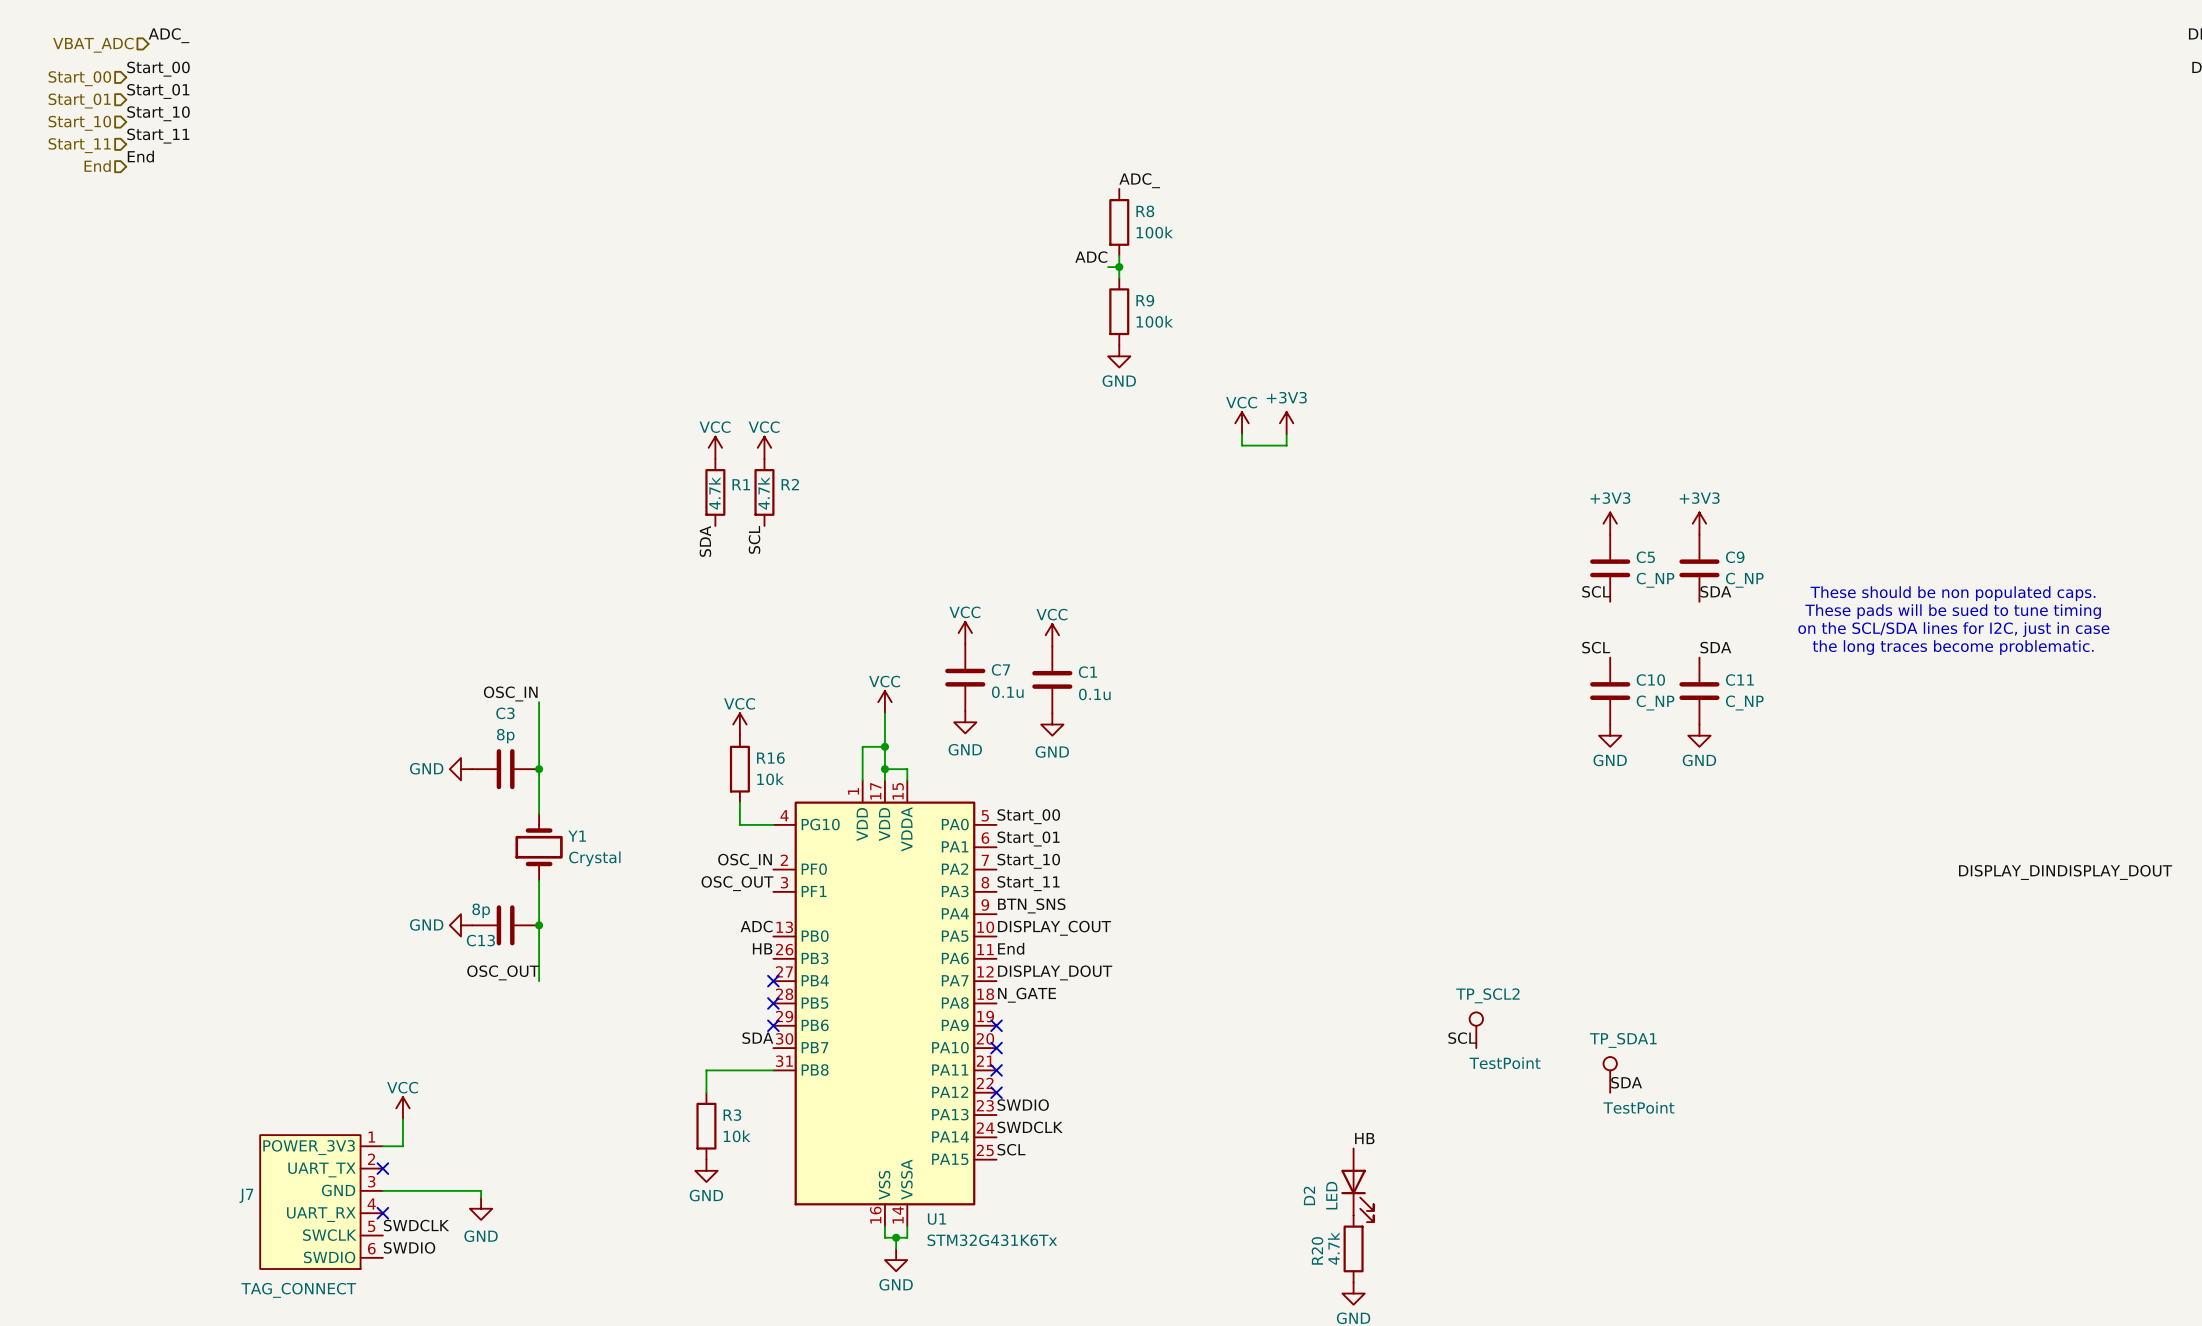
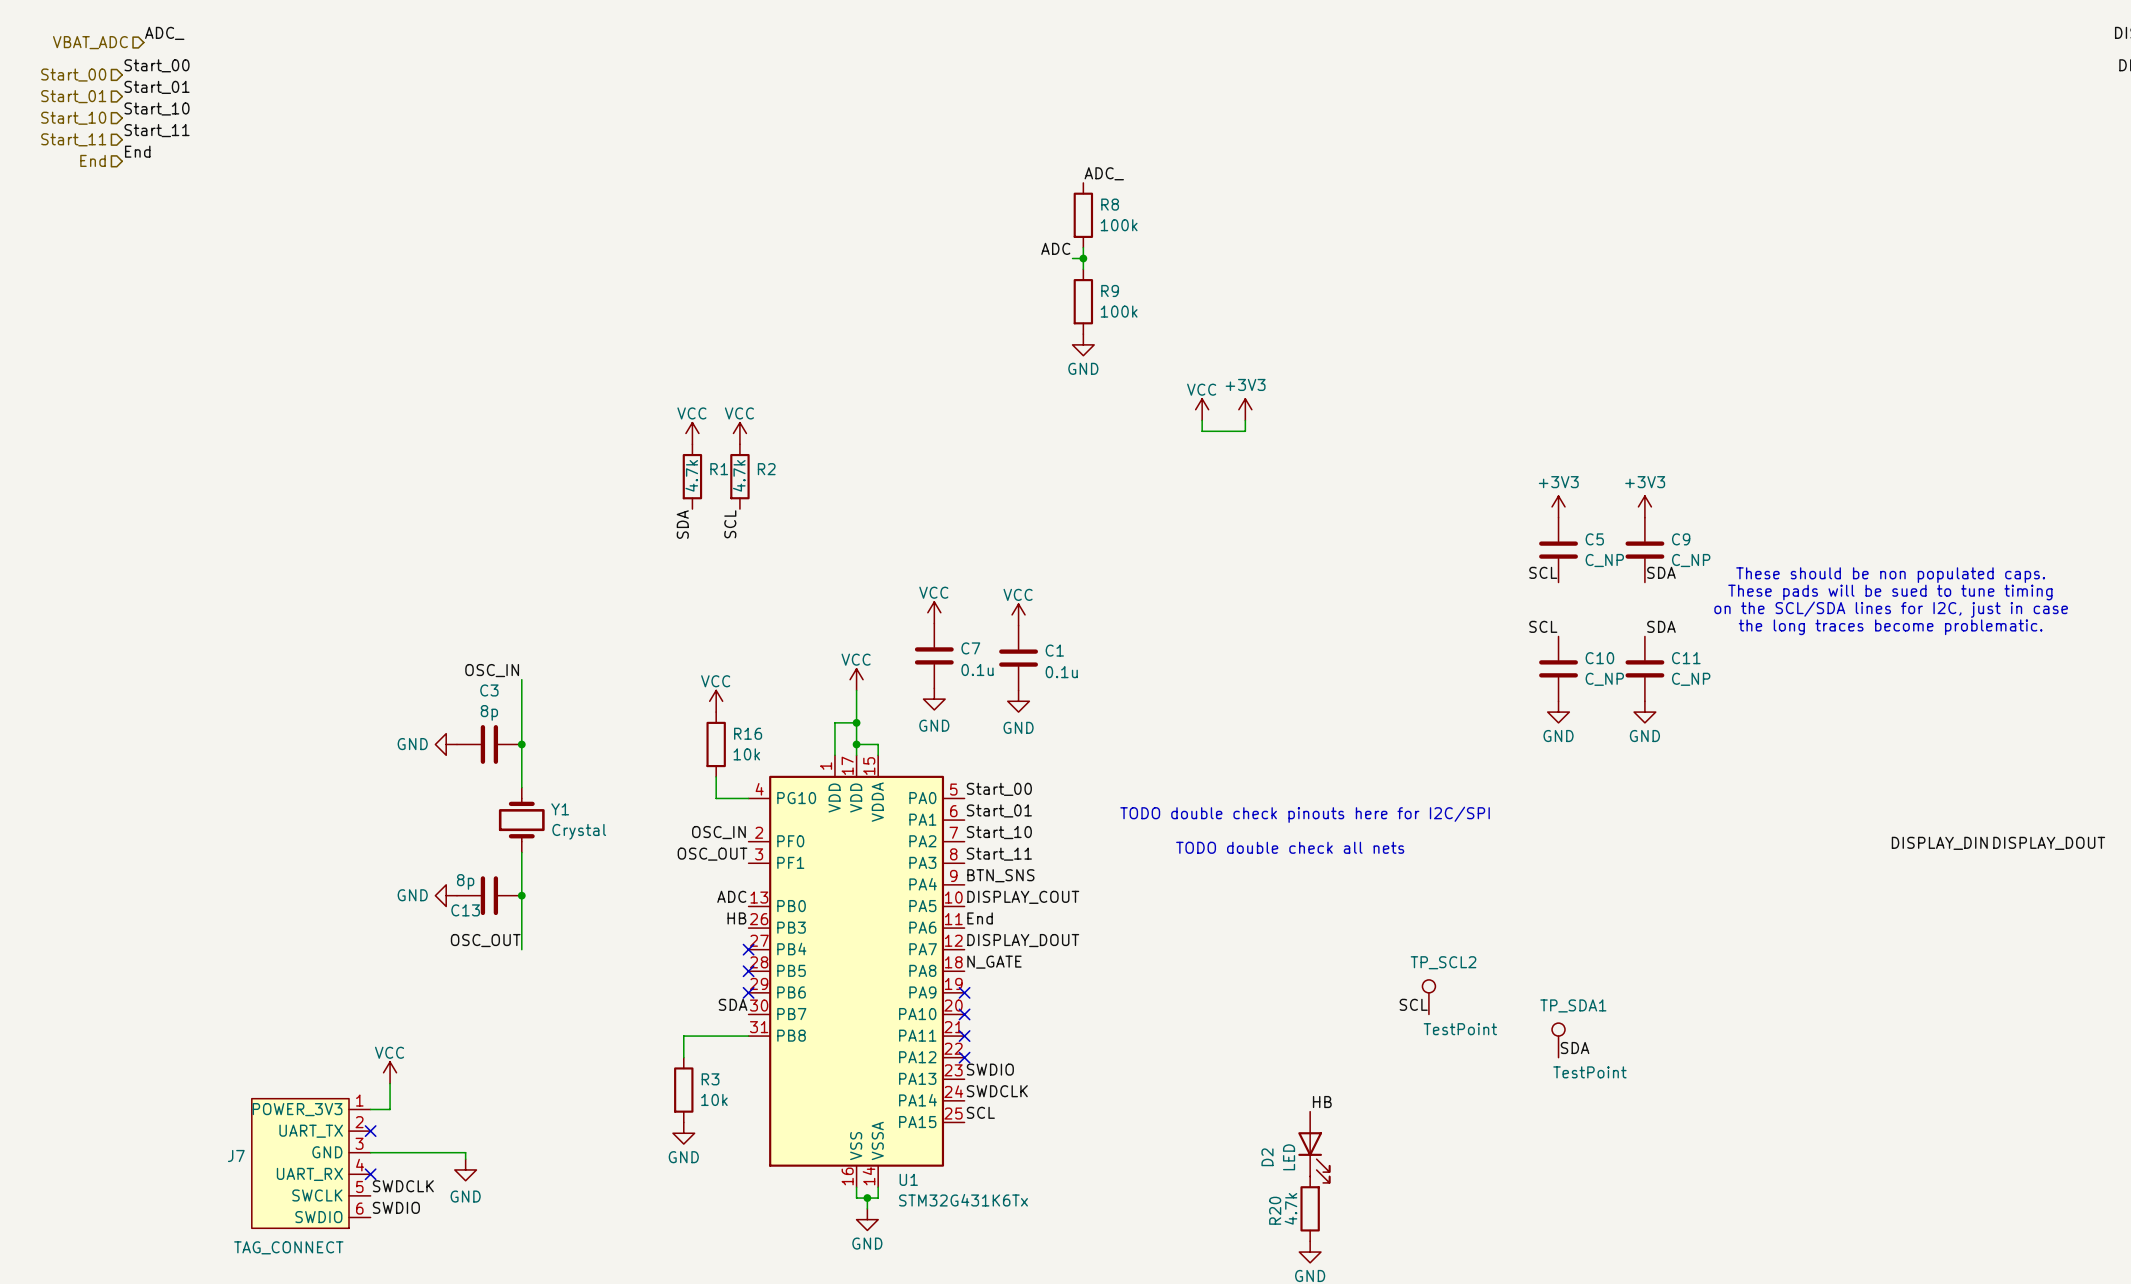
text: none -> TODO double check pinouts here for I2C/SPI (1305, 814)
text: none -> TODO double check all nets (1290, 847)

